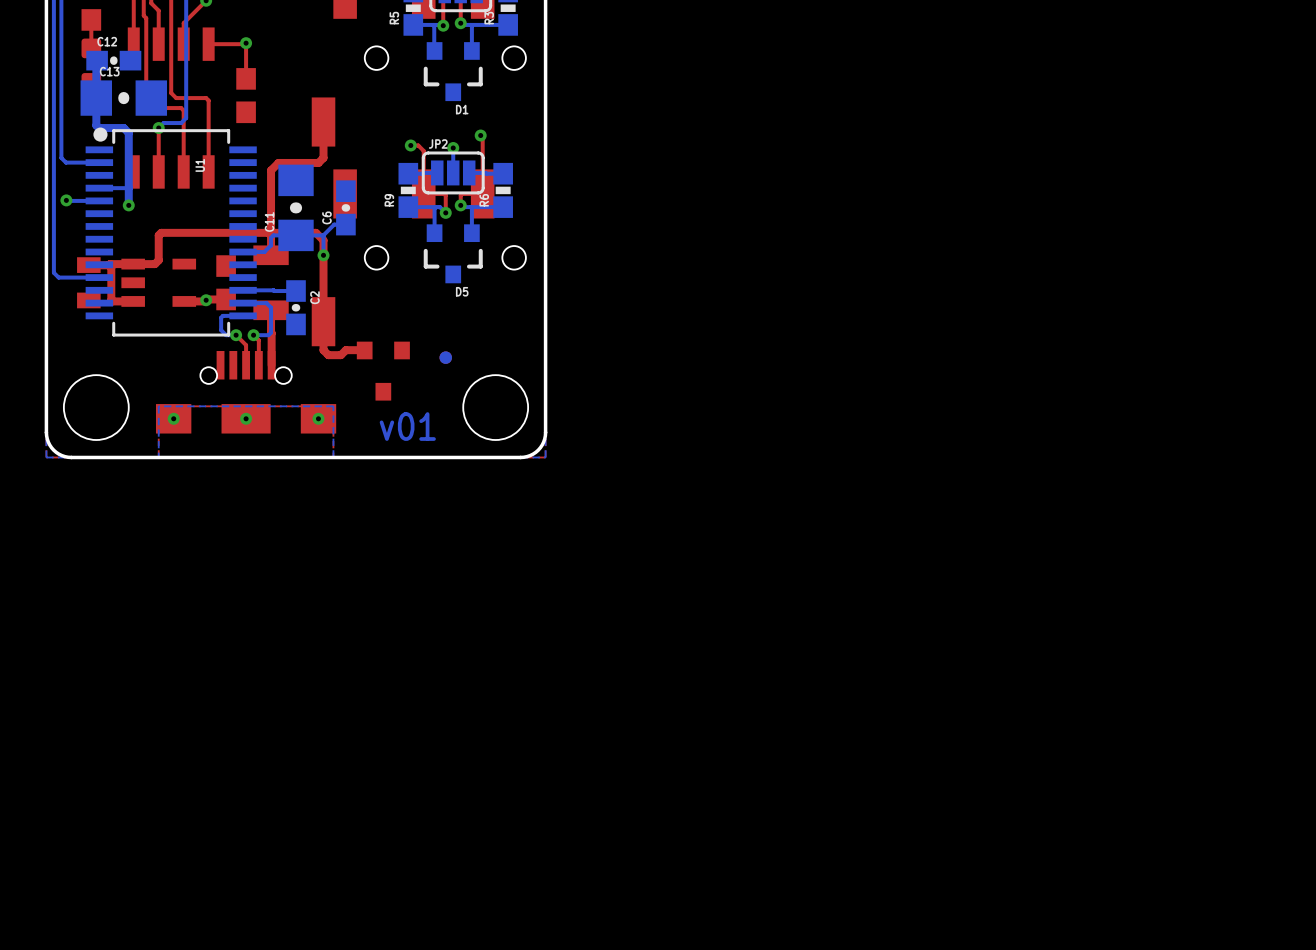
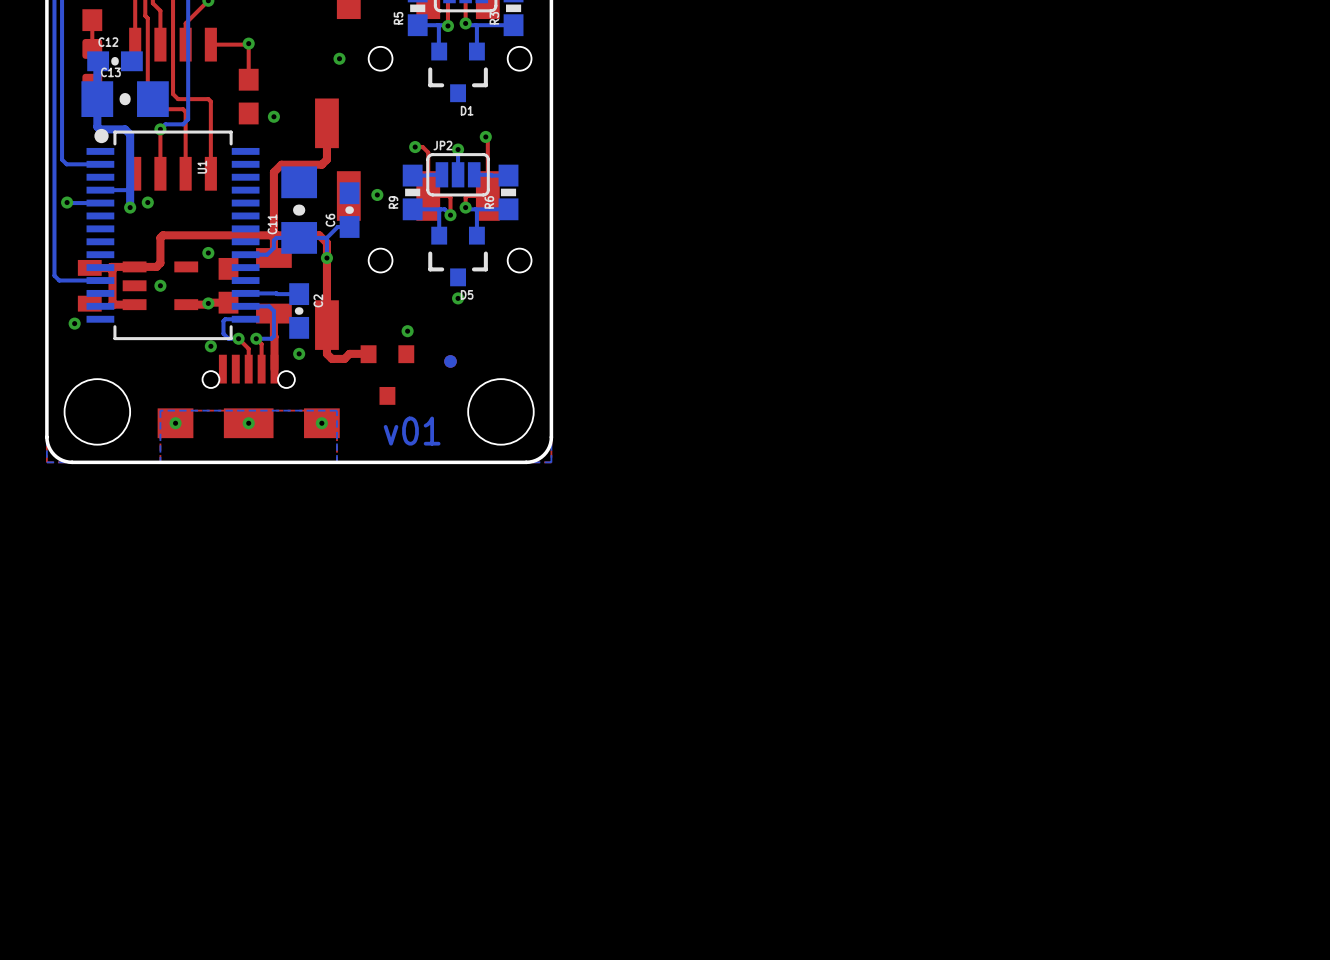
via: none -> (339, 58)
via: none -> (273, 116)
via: none -> (377, 194)
via: none -> (147, 202)
via: none -> (208, 252)
via: none -> (160, 285)
via: none -> (458, 298)
via: none -> (74, 323)
via: none -> (407, 331)
via: none -> (210, 346)
via: none -> (299, 353)

